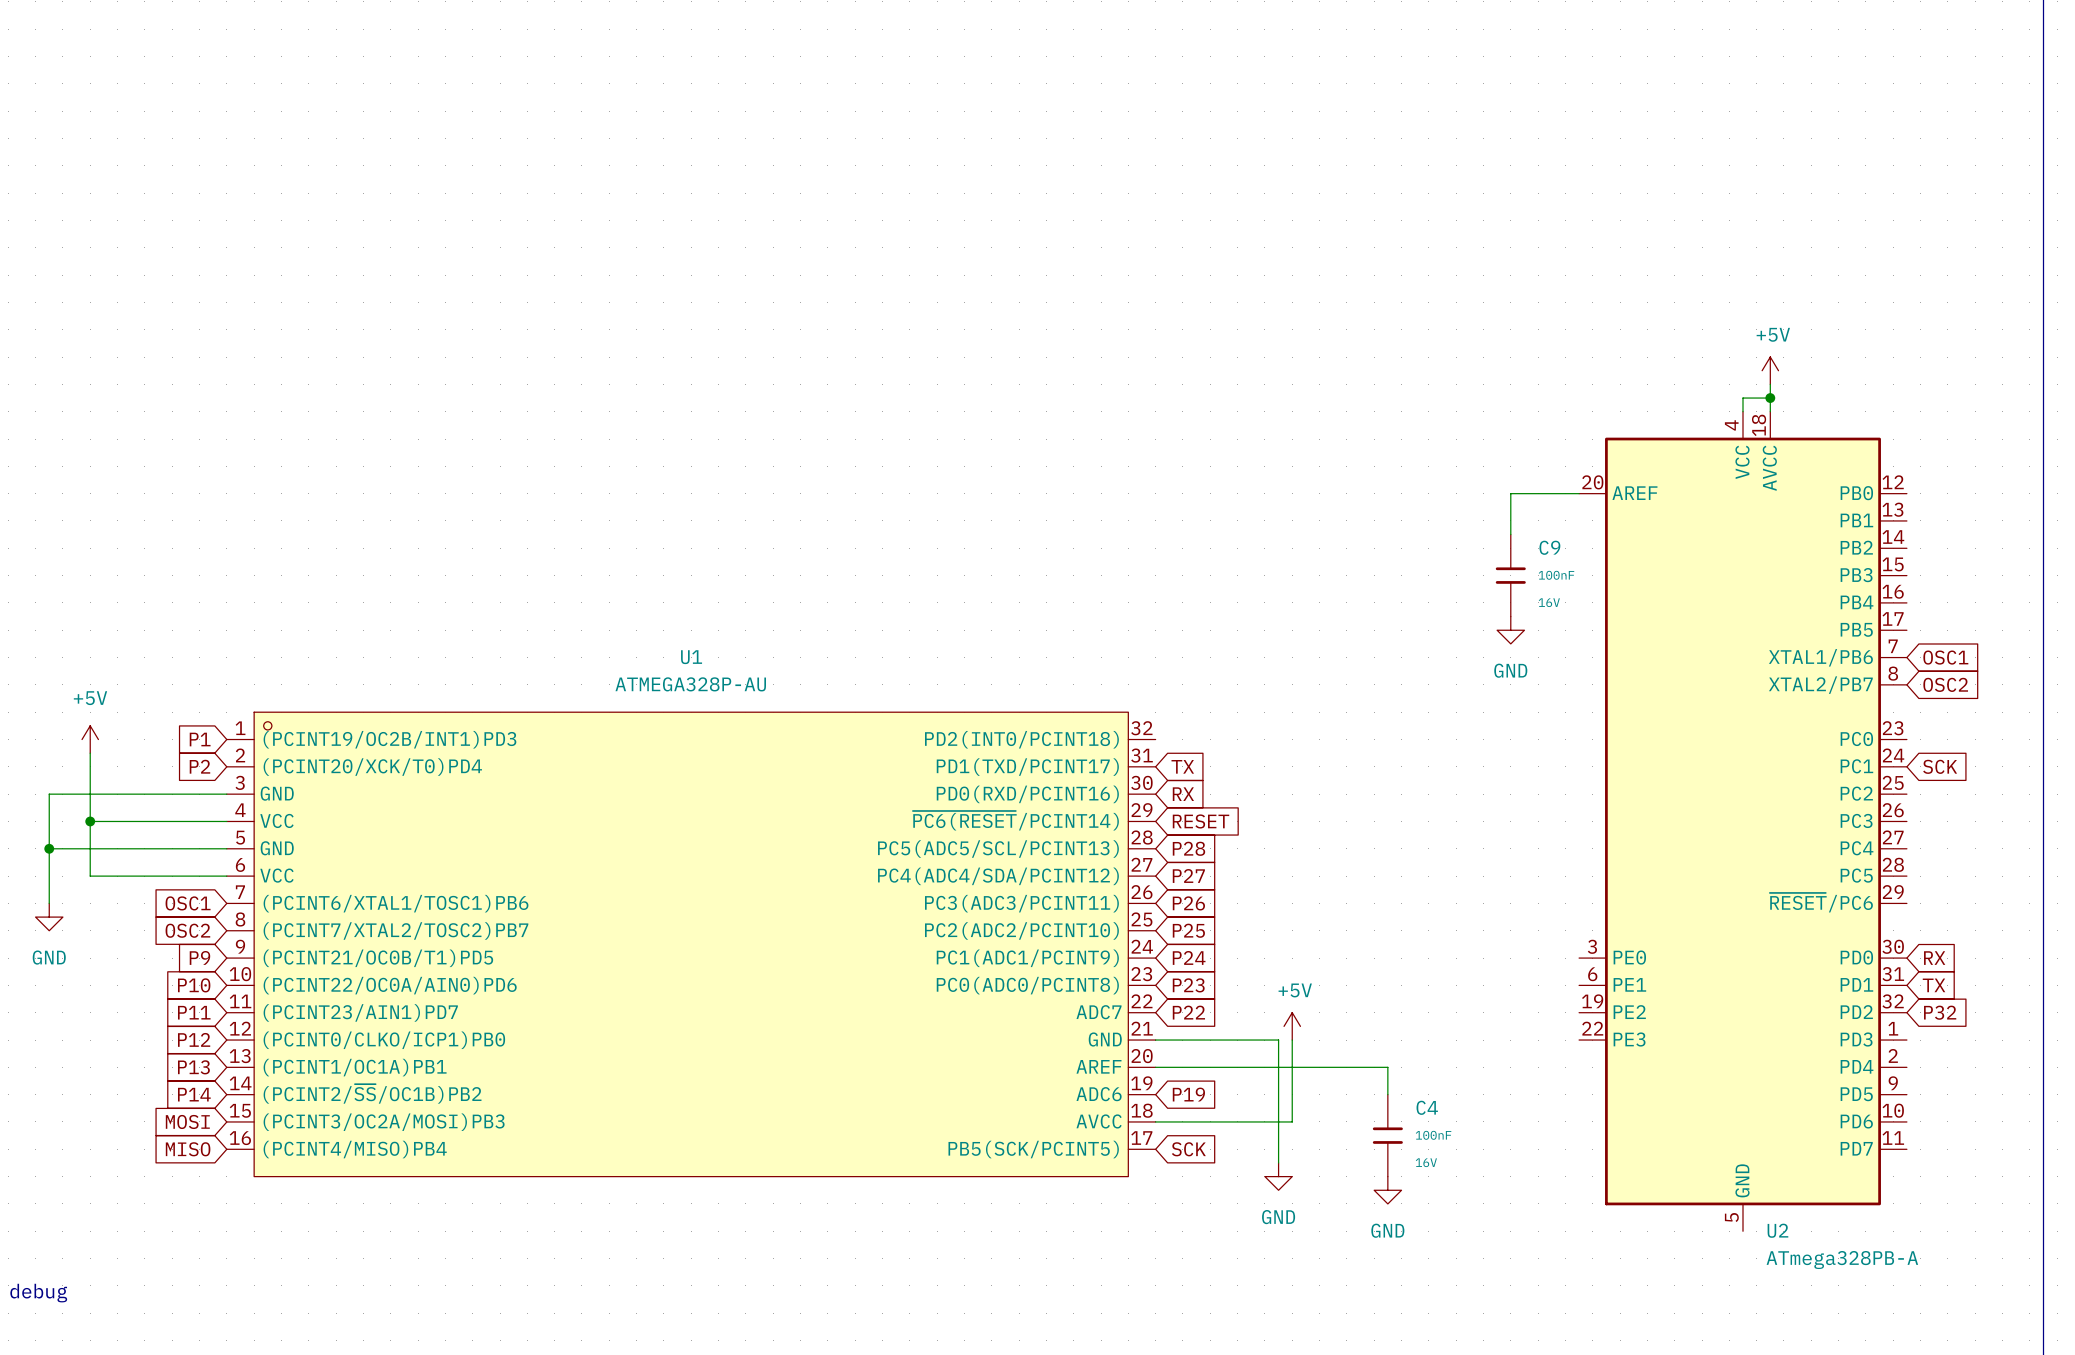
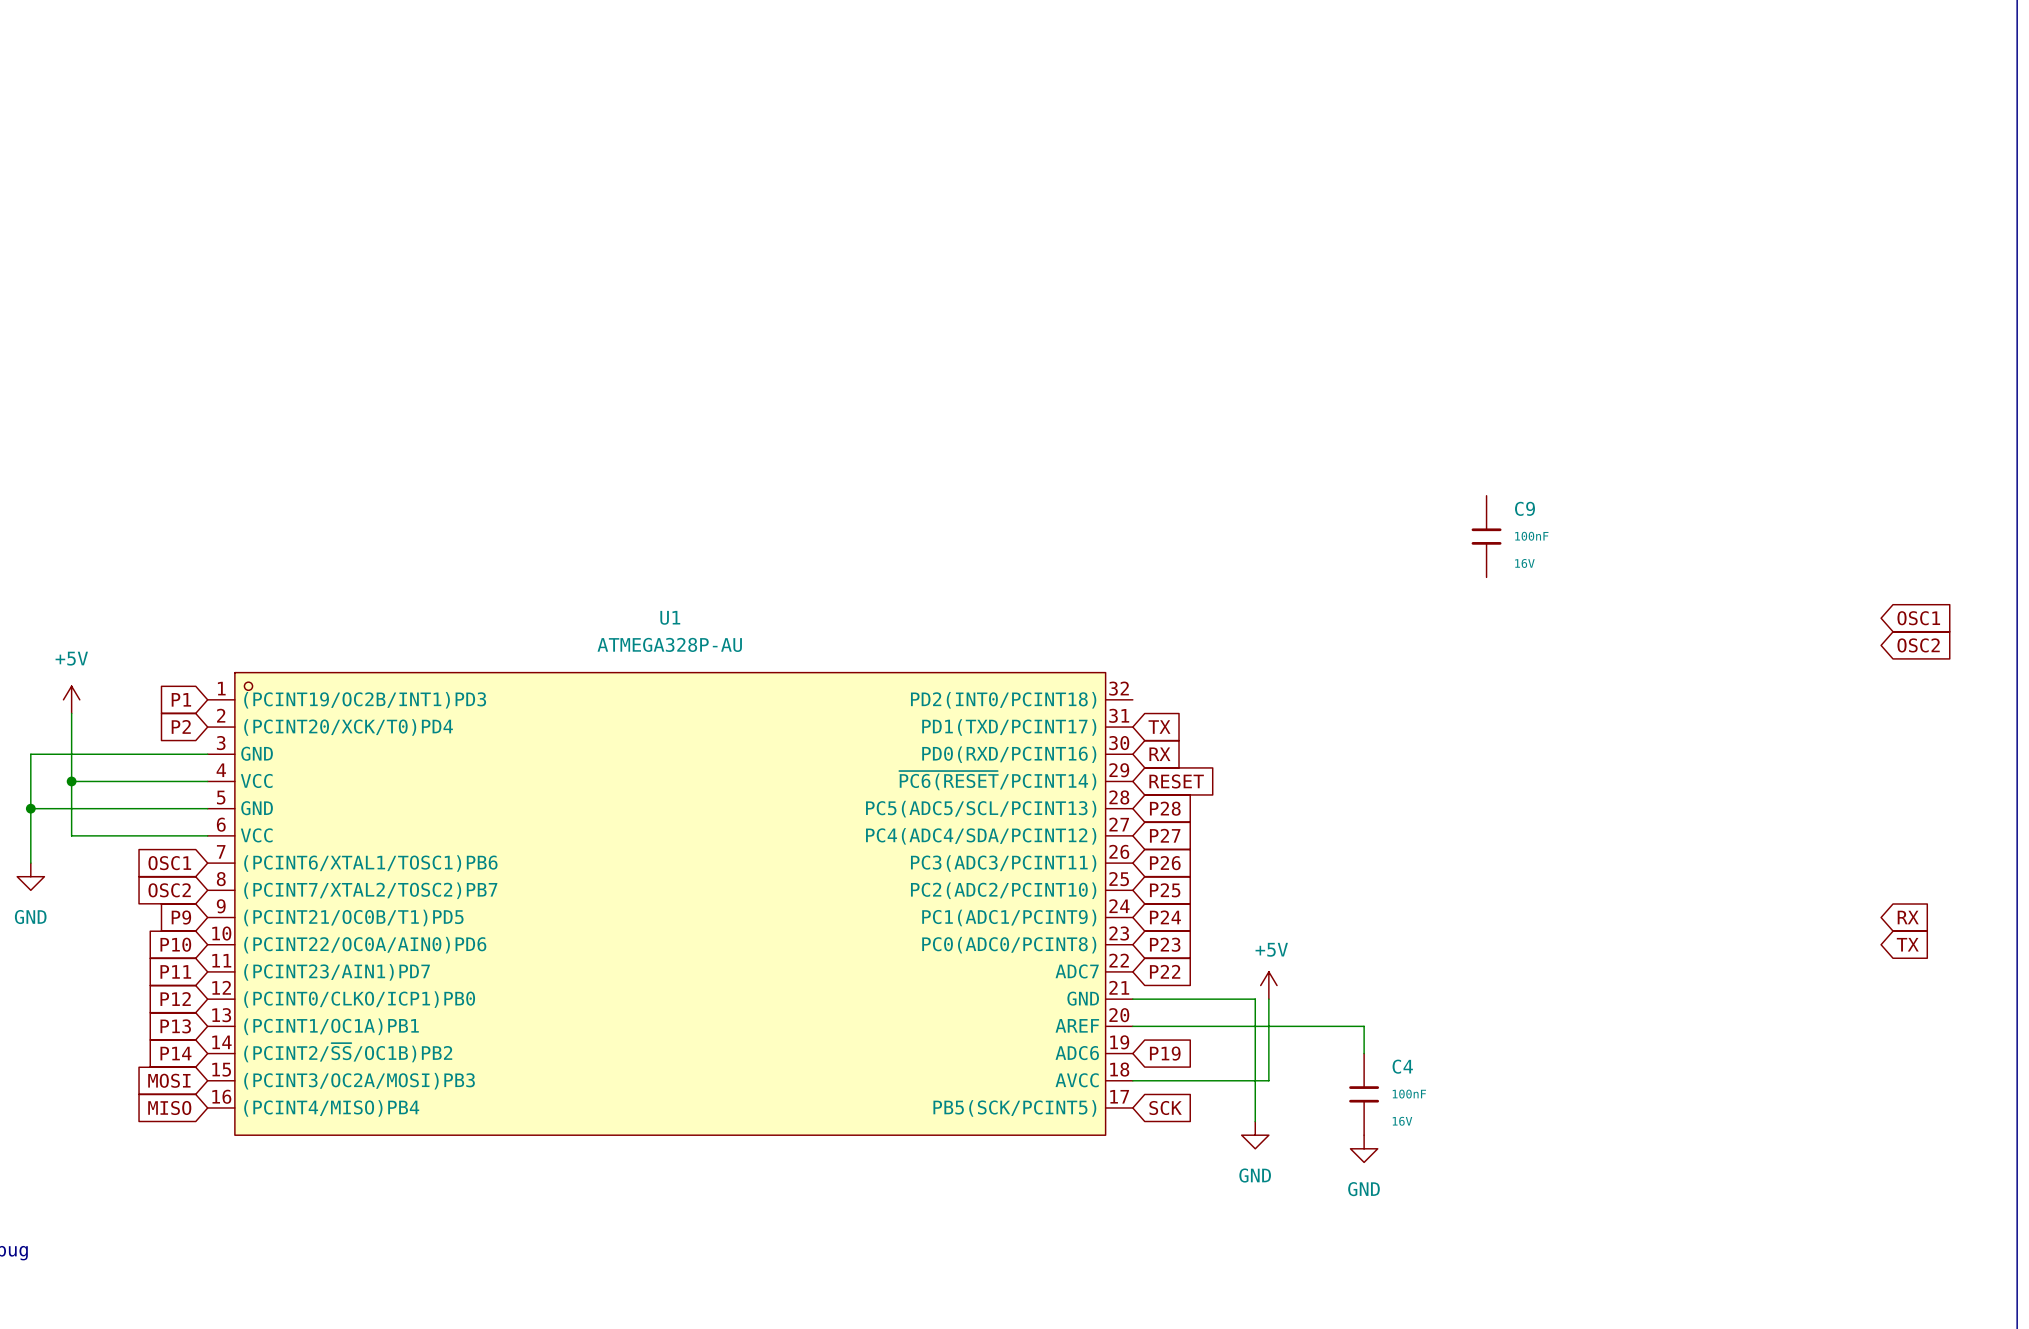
power symbol: +5V (1770, 370) -> none
wire: (1770, 384) (1770, 411) -> none
wire: (1770, 398) (1742, 398) (1742, 411) -> none
junction: (1770, 398) -> none
wire: (1579, 493) (1510, 493) (1510, 534) -> none
power symbol: GND (1510, 630) -> none
global label: SCK (1940, 766) -> none
U2: ATmega328PB-A (1742, 821) -> none
global label: P32 (1940, 1012) -> none

